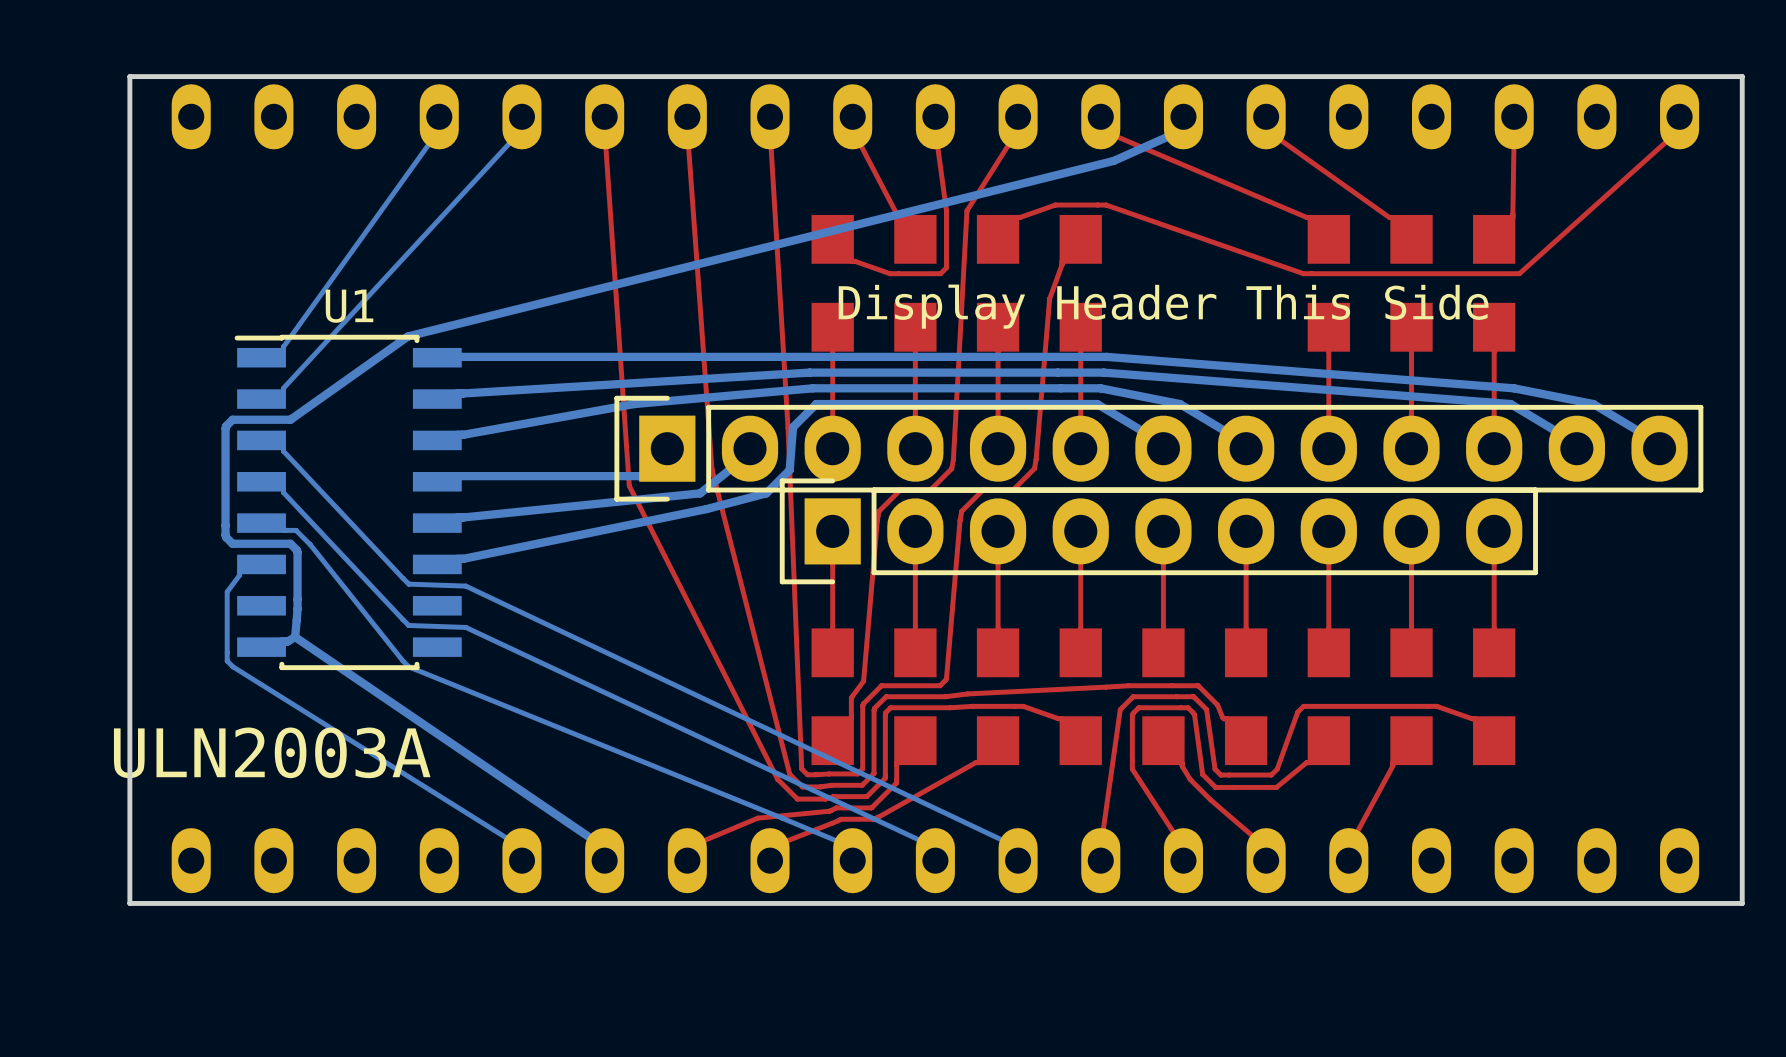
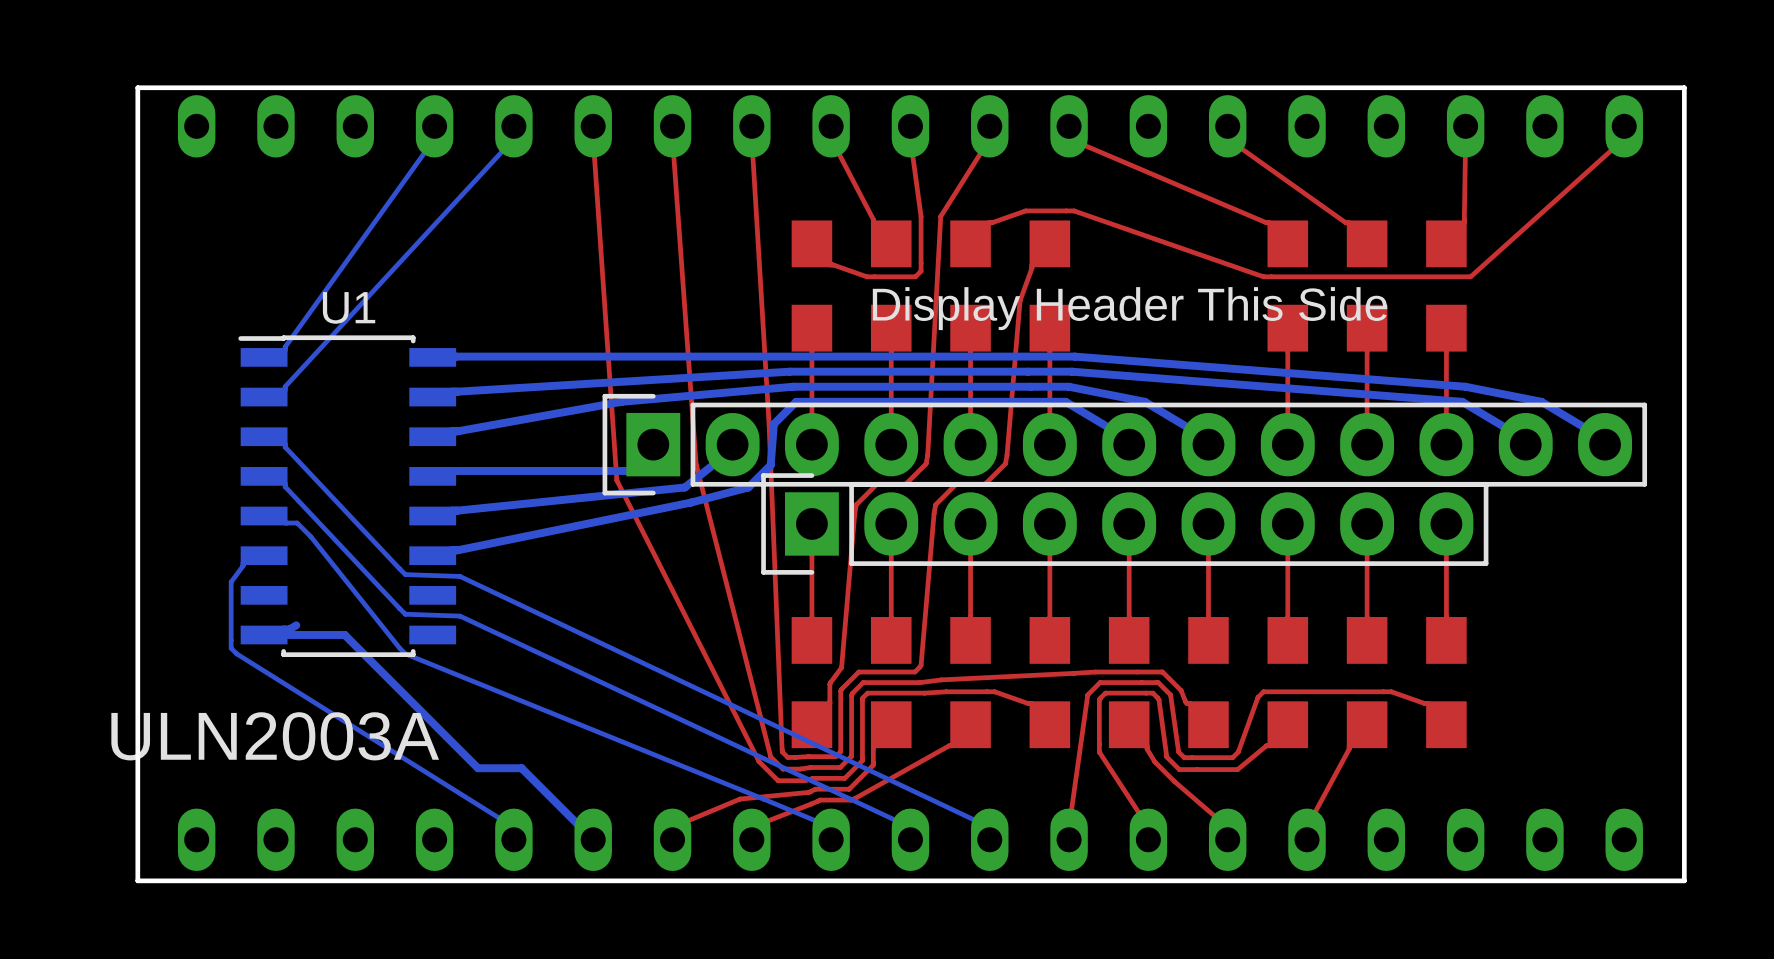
bottom track: (1183, 129) (1113, 160) (408, 336) (290, 419) (232, 419) (226, 426) (226, 537) (232, 543) (290, 543) (296, 550) (297, 608) (295, 637) (604, 847) (604, 860) -> (264, 634) (344, 634) (478, 768) (521, 768) (593, 839)

